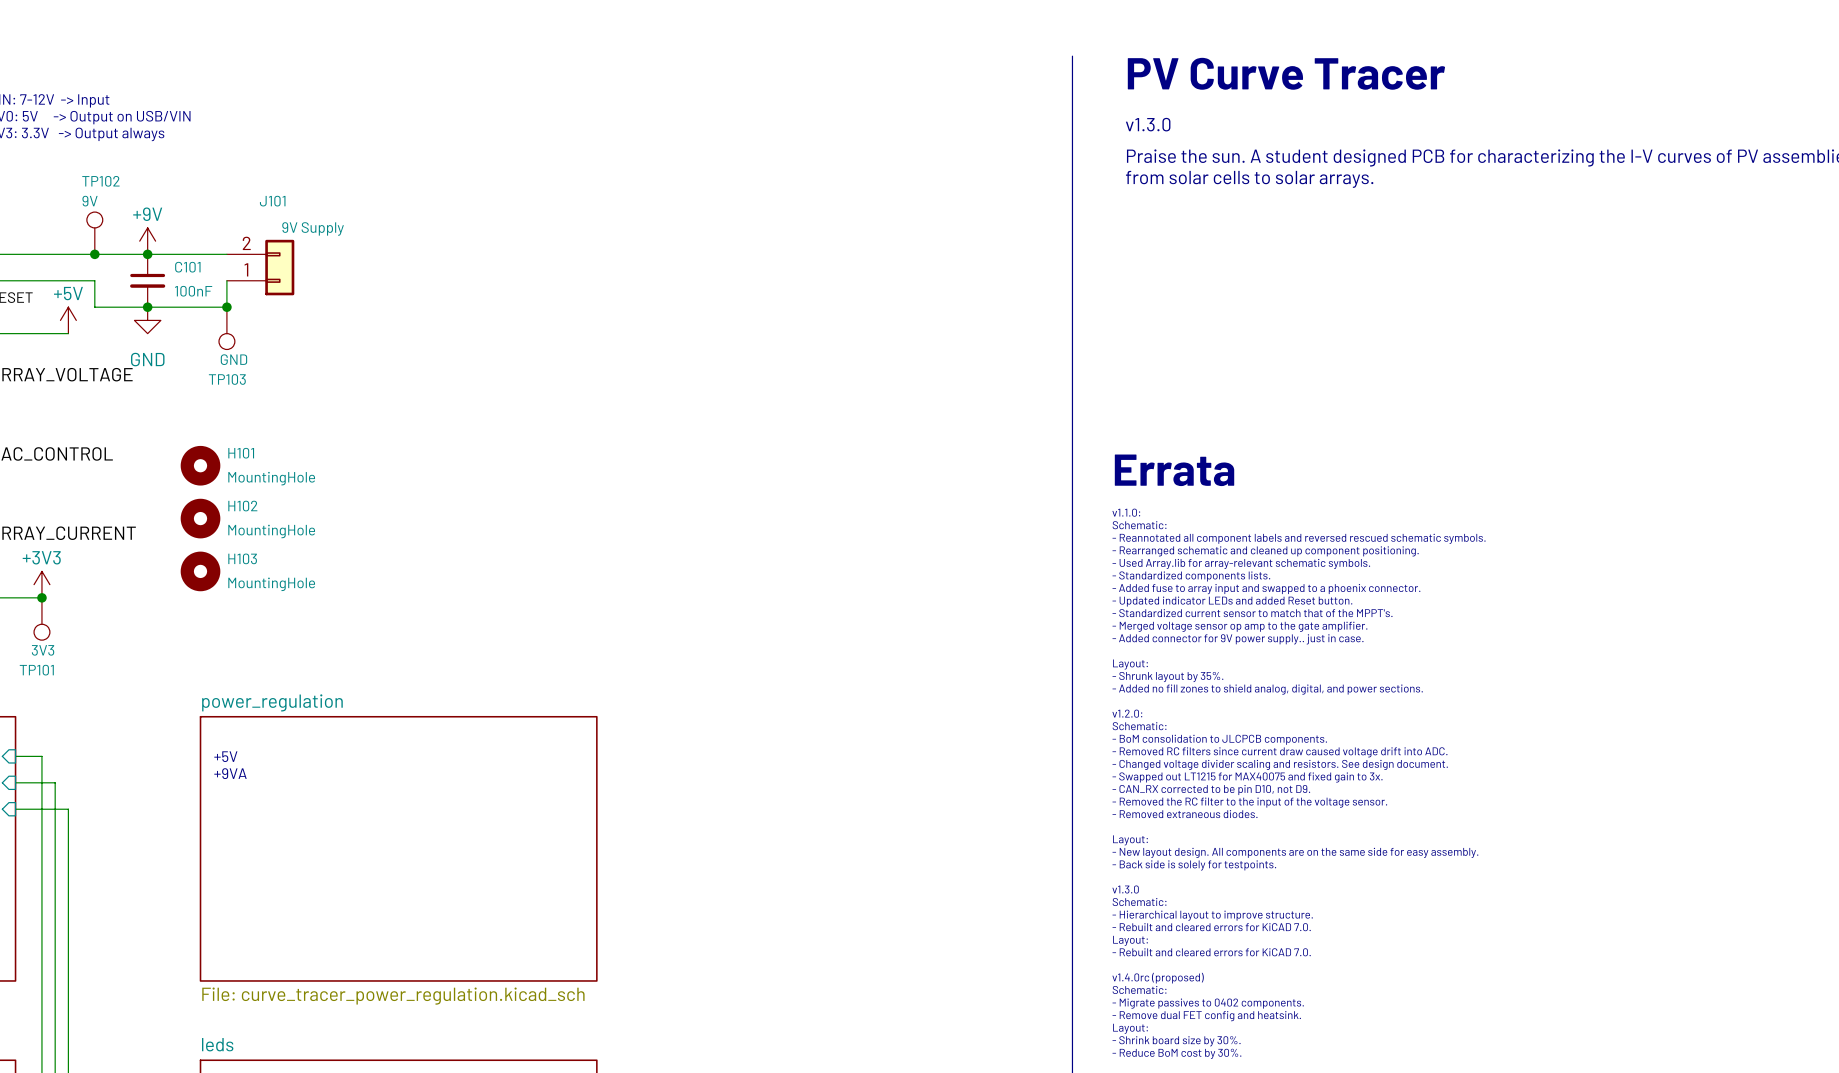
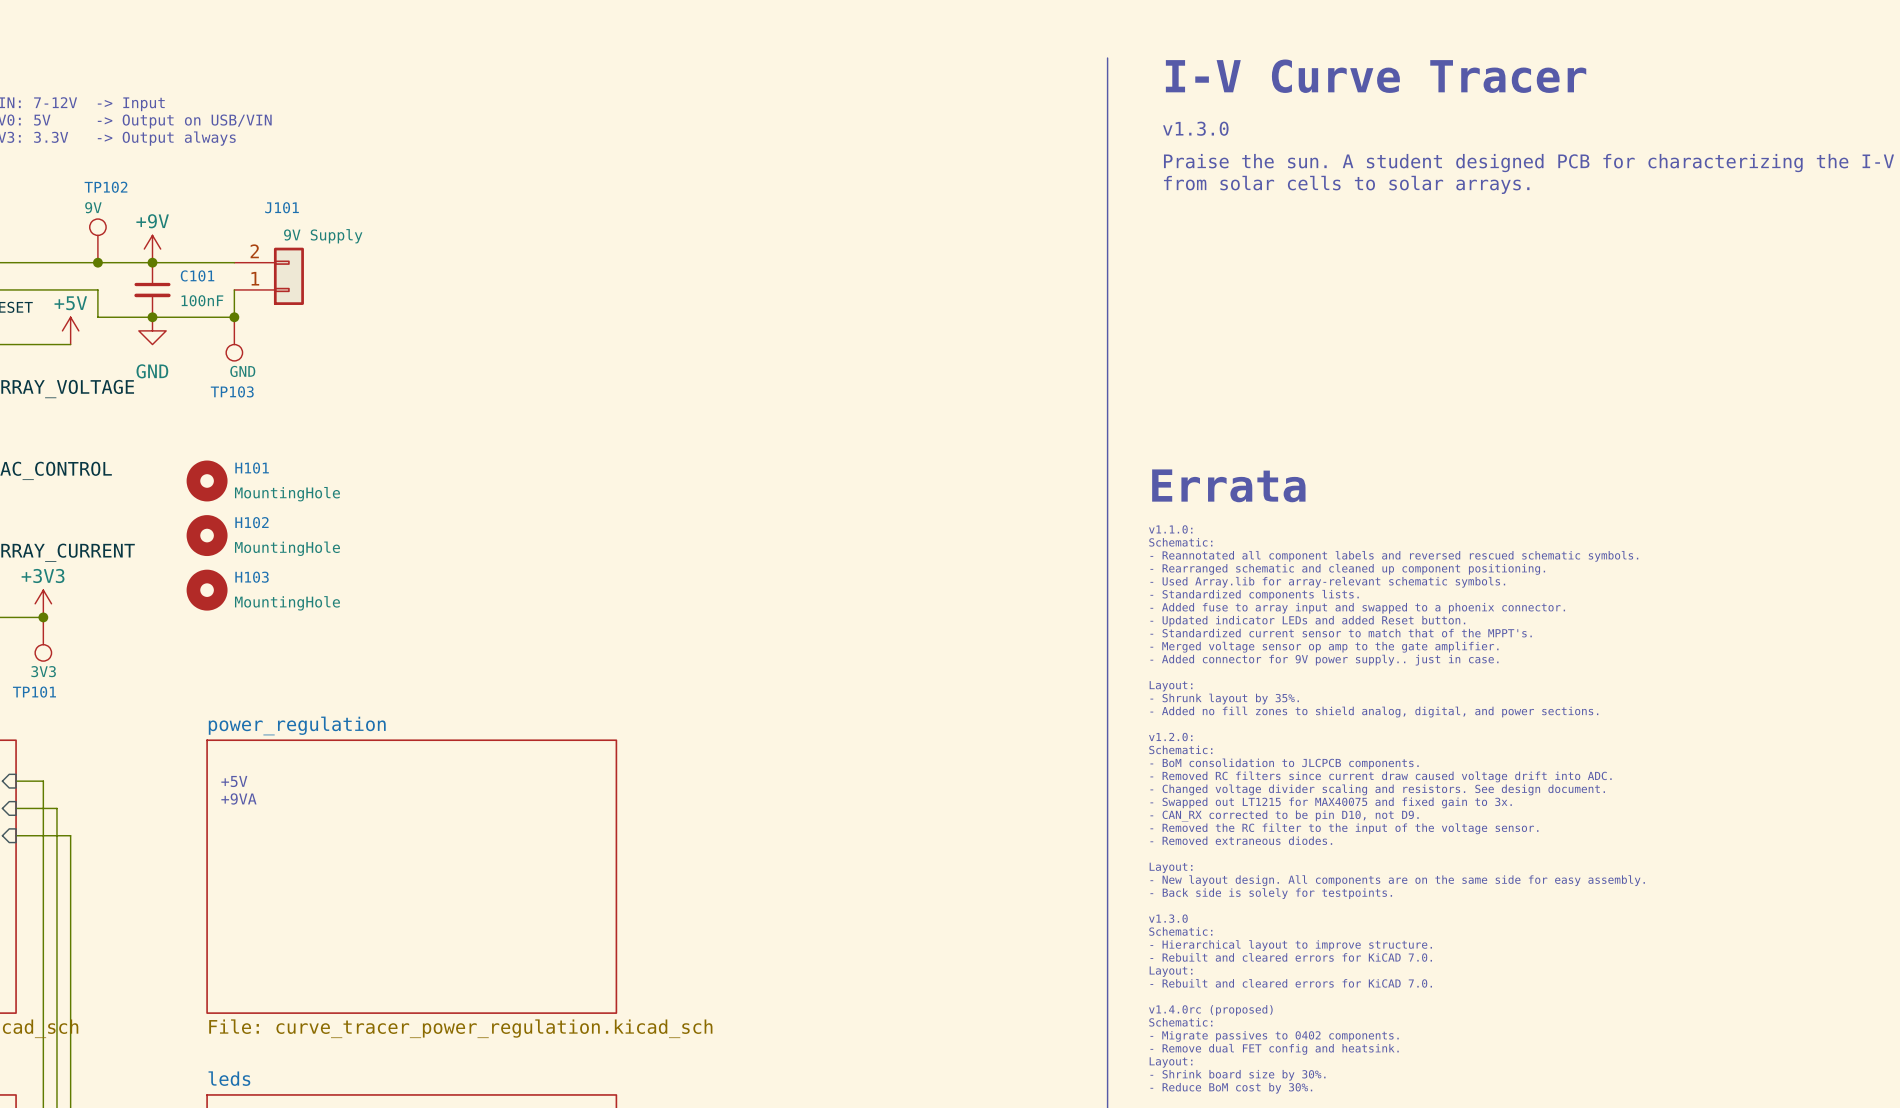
text: PV Curve Tracer (1286, 73) -> I-V Curve Tracer (1376, 76)

